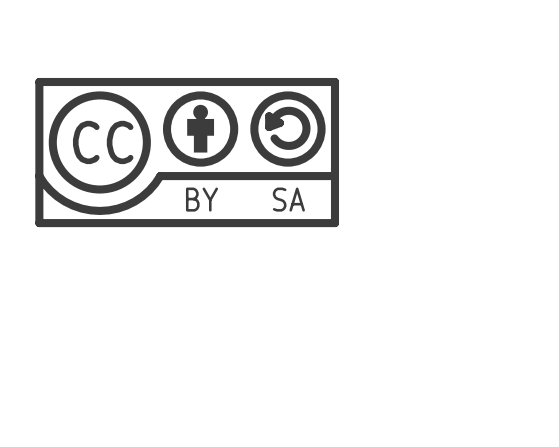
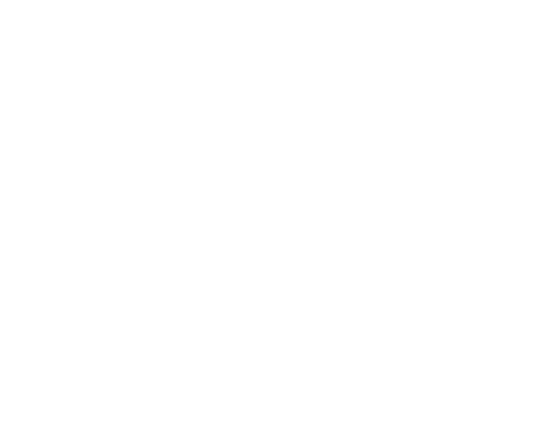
drawing: [35, 77, 340, 228] -> none

